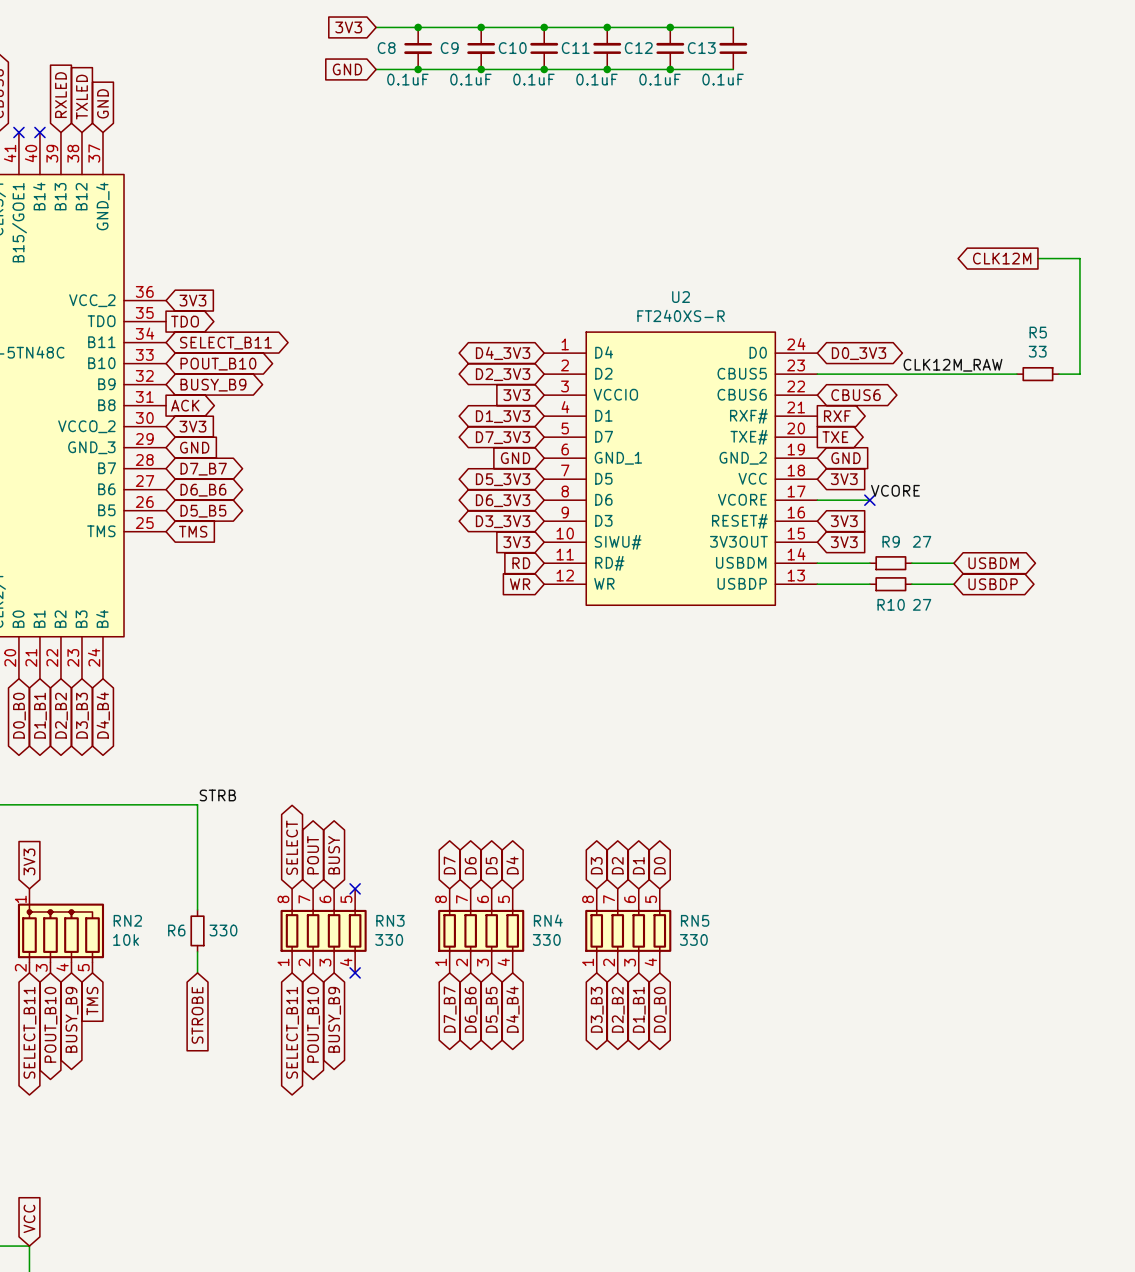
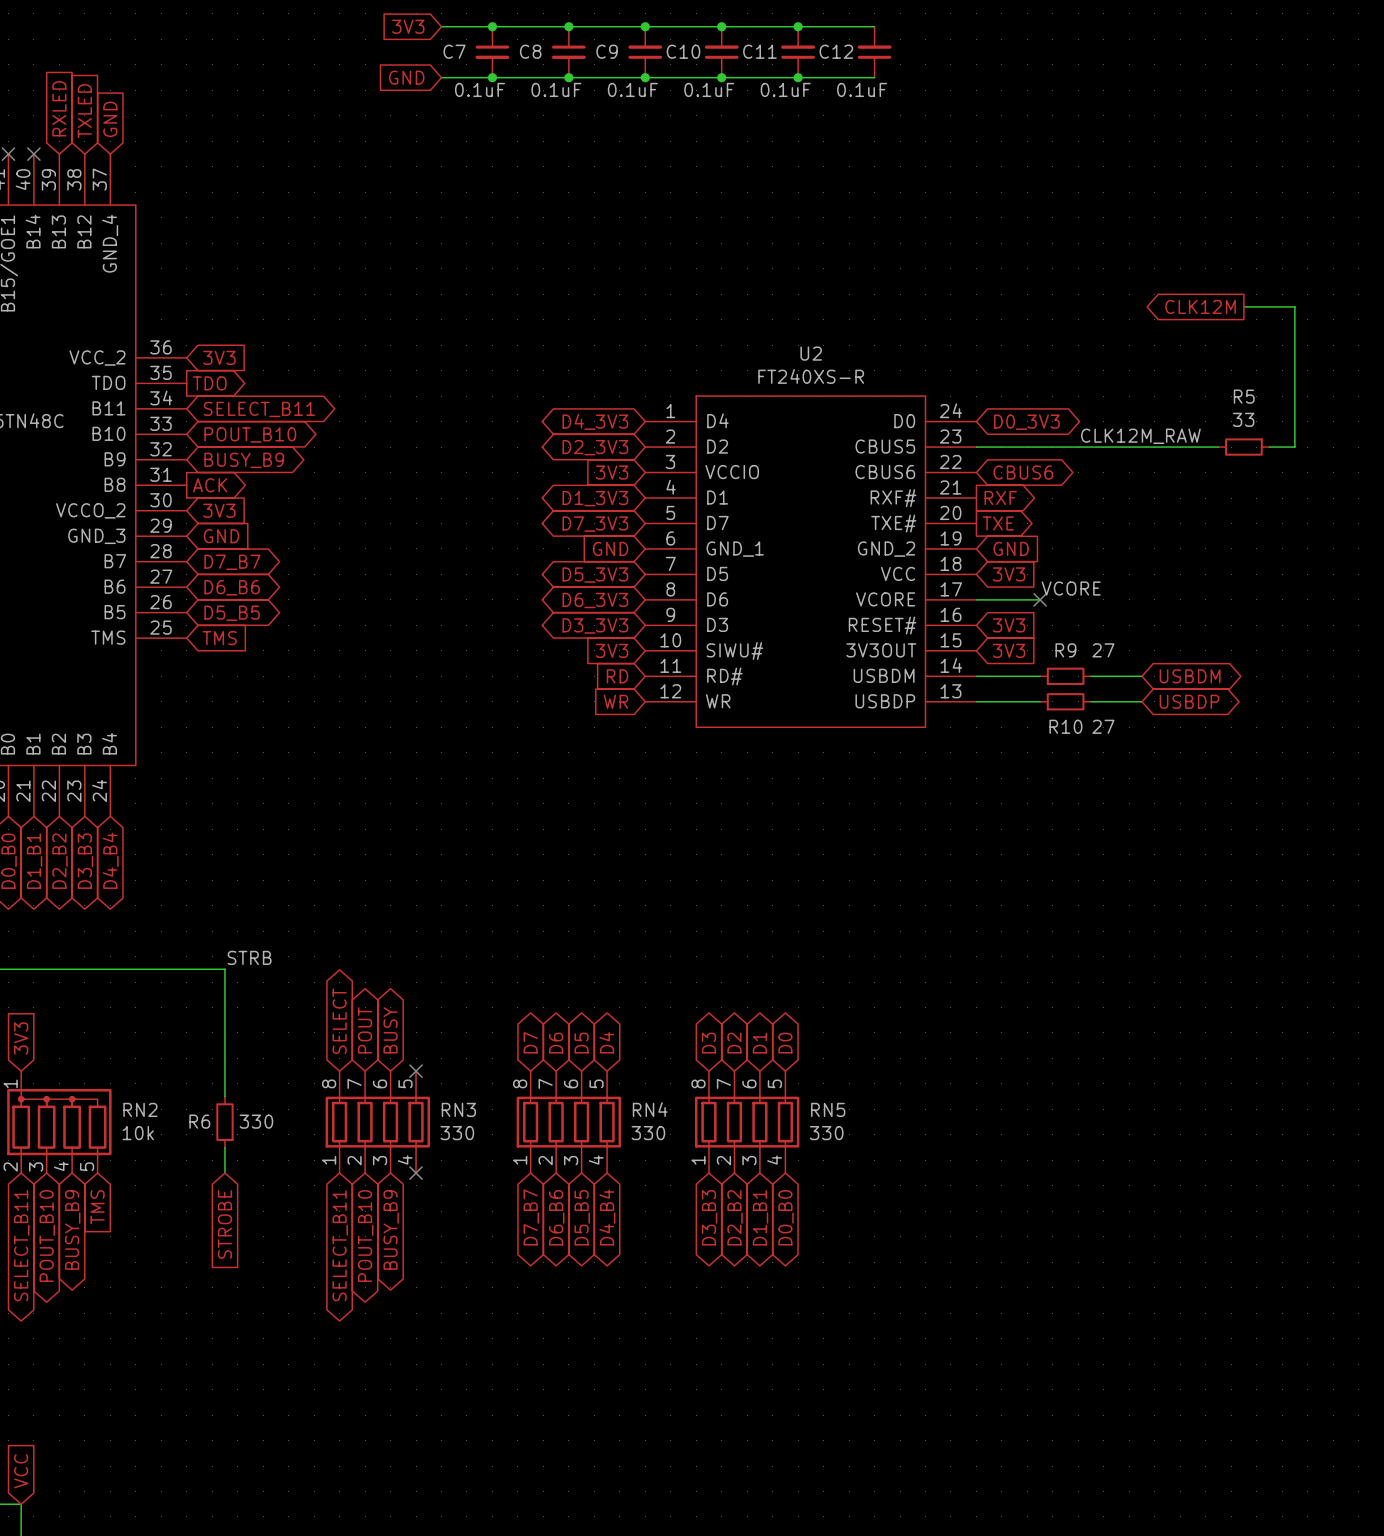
C8 name: C8 (386, 48) -> C7 (454, 51)
C9 name: C9 (449, 48) -> C8 (530, 51)
C10 name: C10 (512, 48) -> C9 (607, 51)
C11 name: C11 (575, 48) -> C10 (683, 51)
C12 name: C12 (638, 48) -> C11 (759, 51)
C13 name: C13 (701, 48) -> C12 (836, 51)

